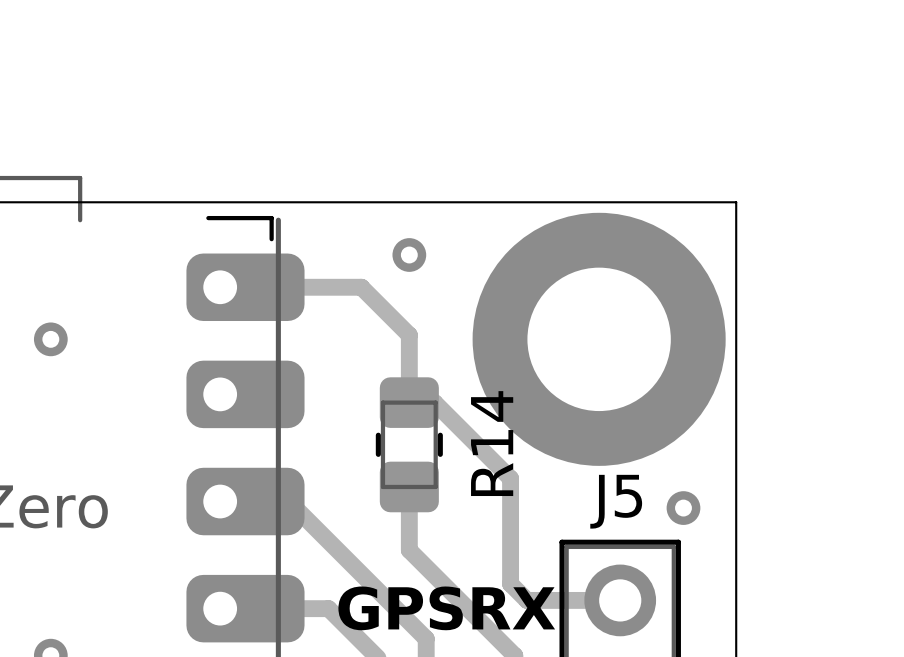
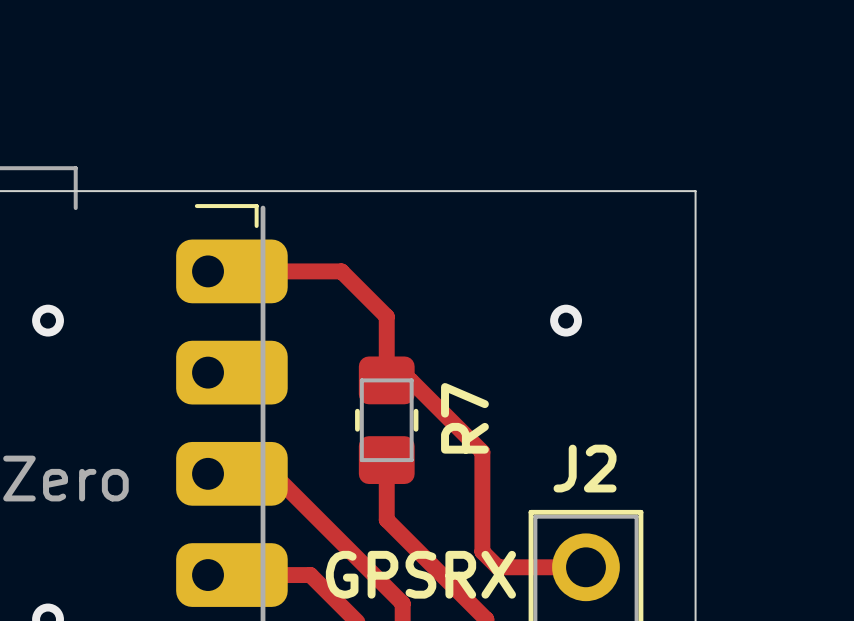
via size: [472, 212, 726, 466] -> [550, 304, 583, 337]
via: (409, 254) -> none
R14 name: R14 (492, 443) -> R7 (464, 418)
J5 name: J5 (616, 501) -> J2 (585, 468)
via: (683, 508) -> none

